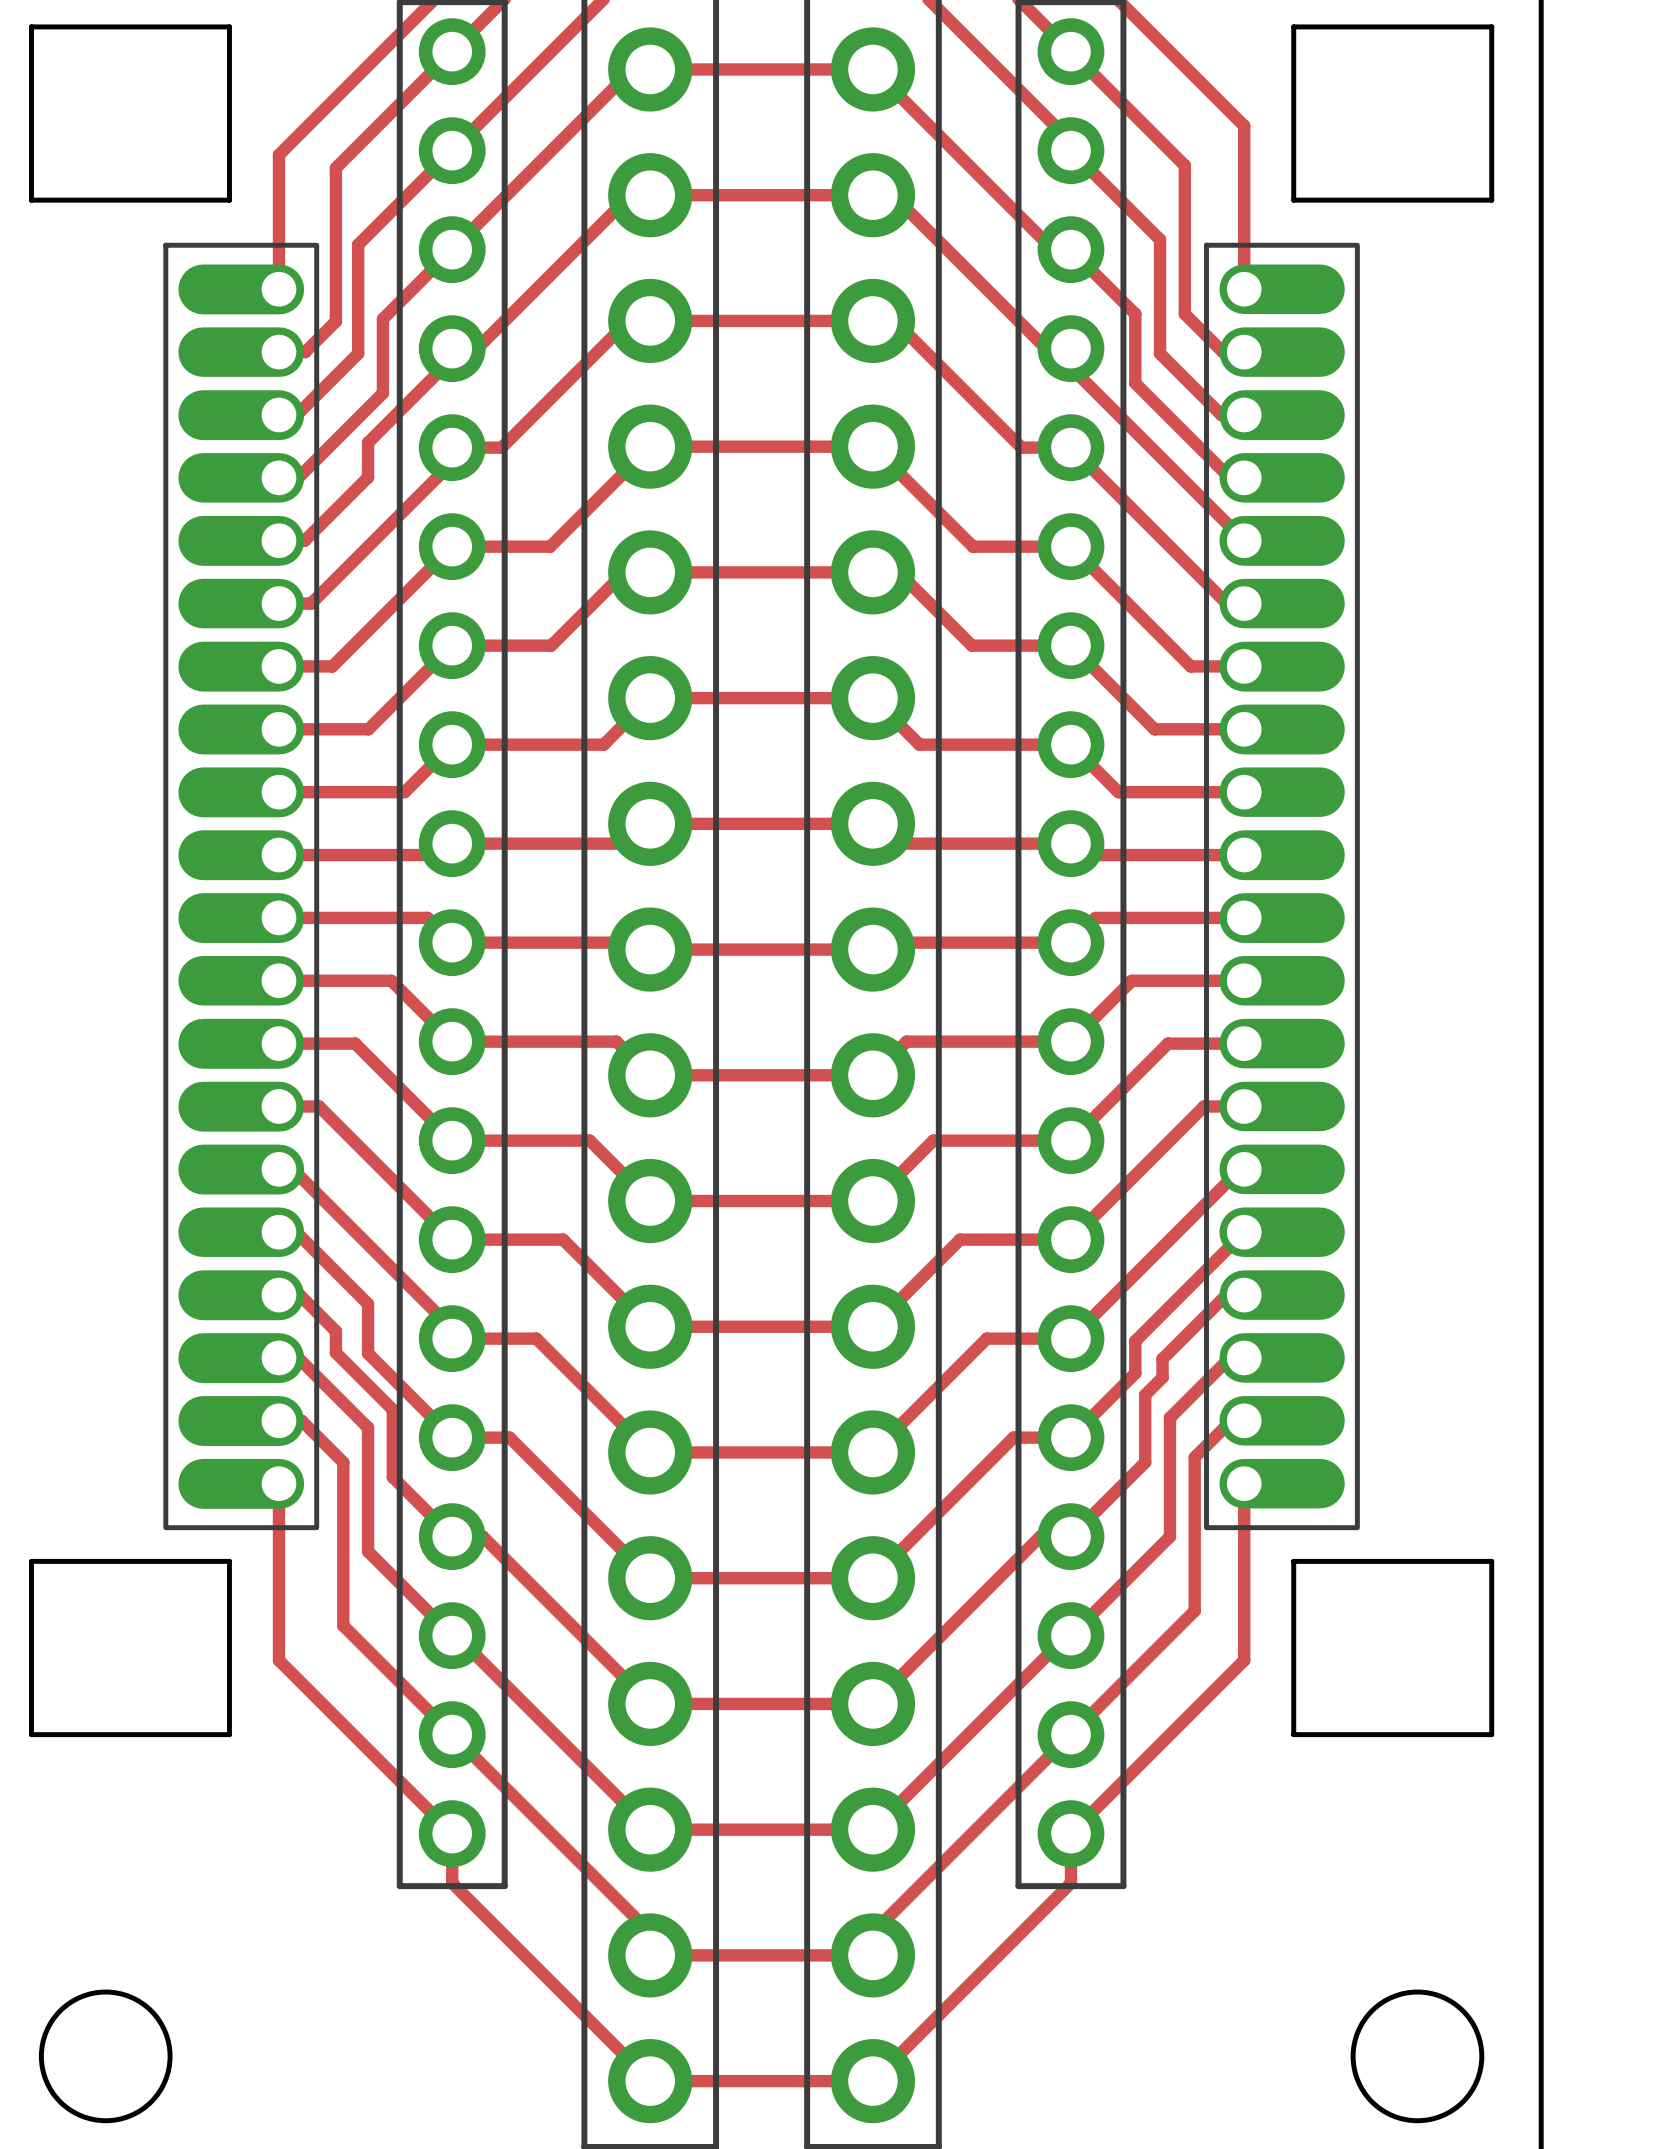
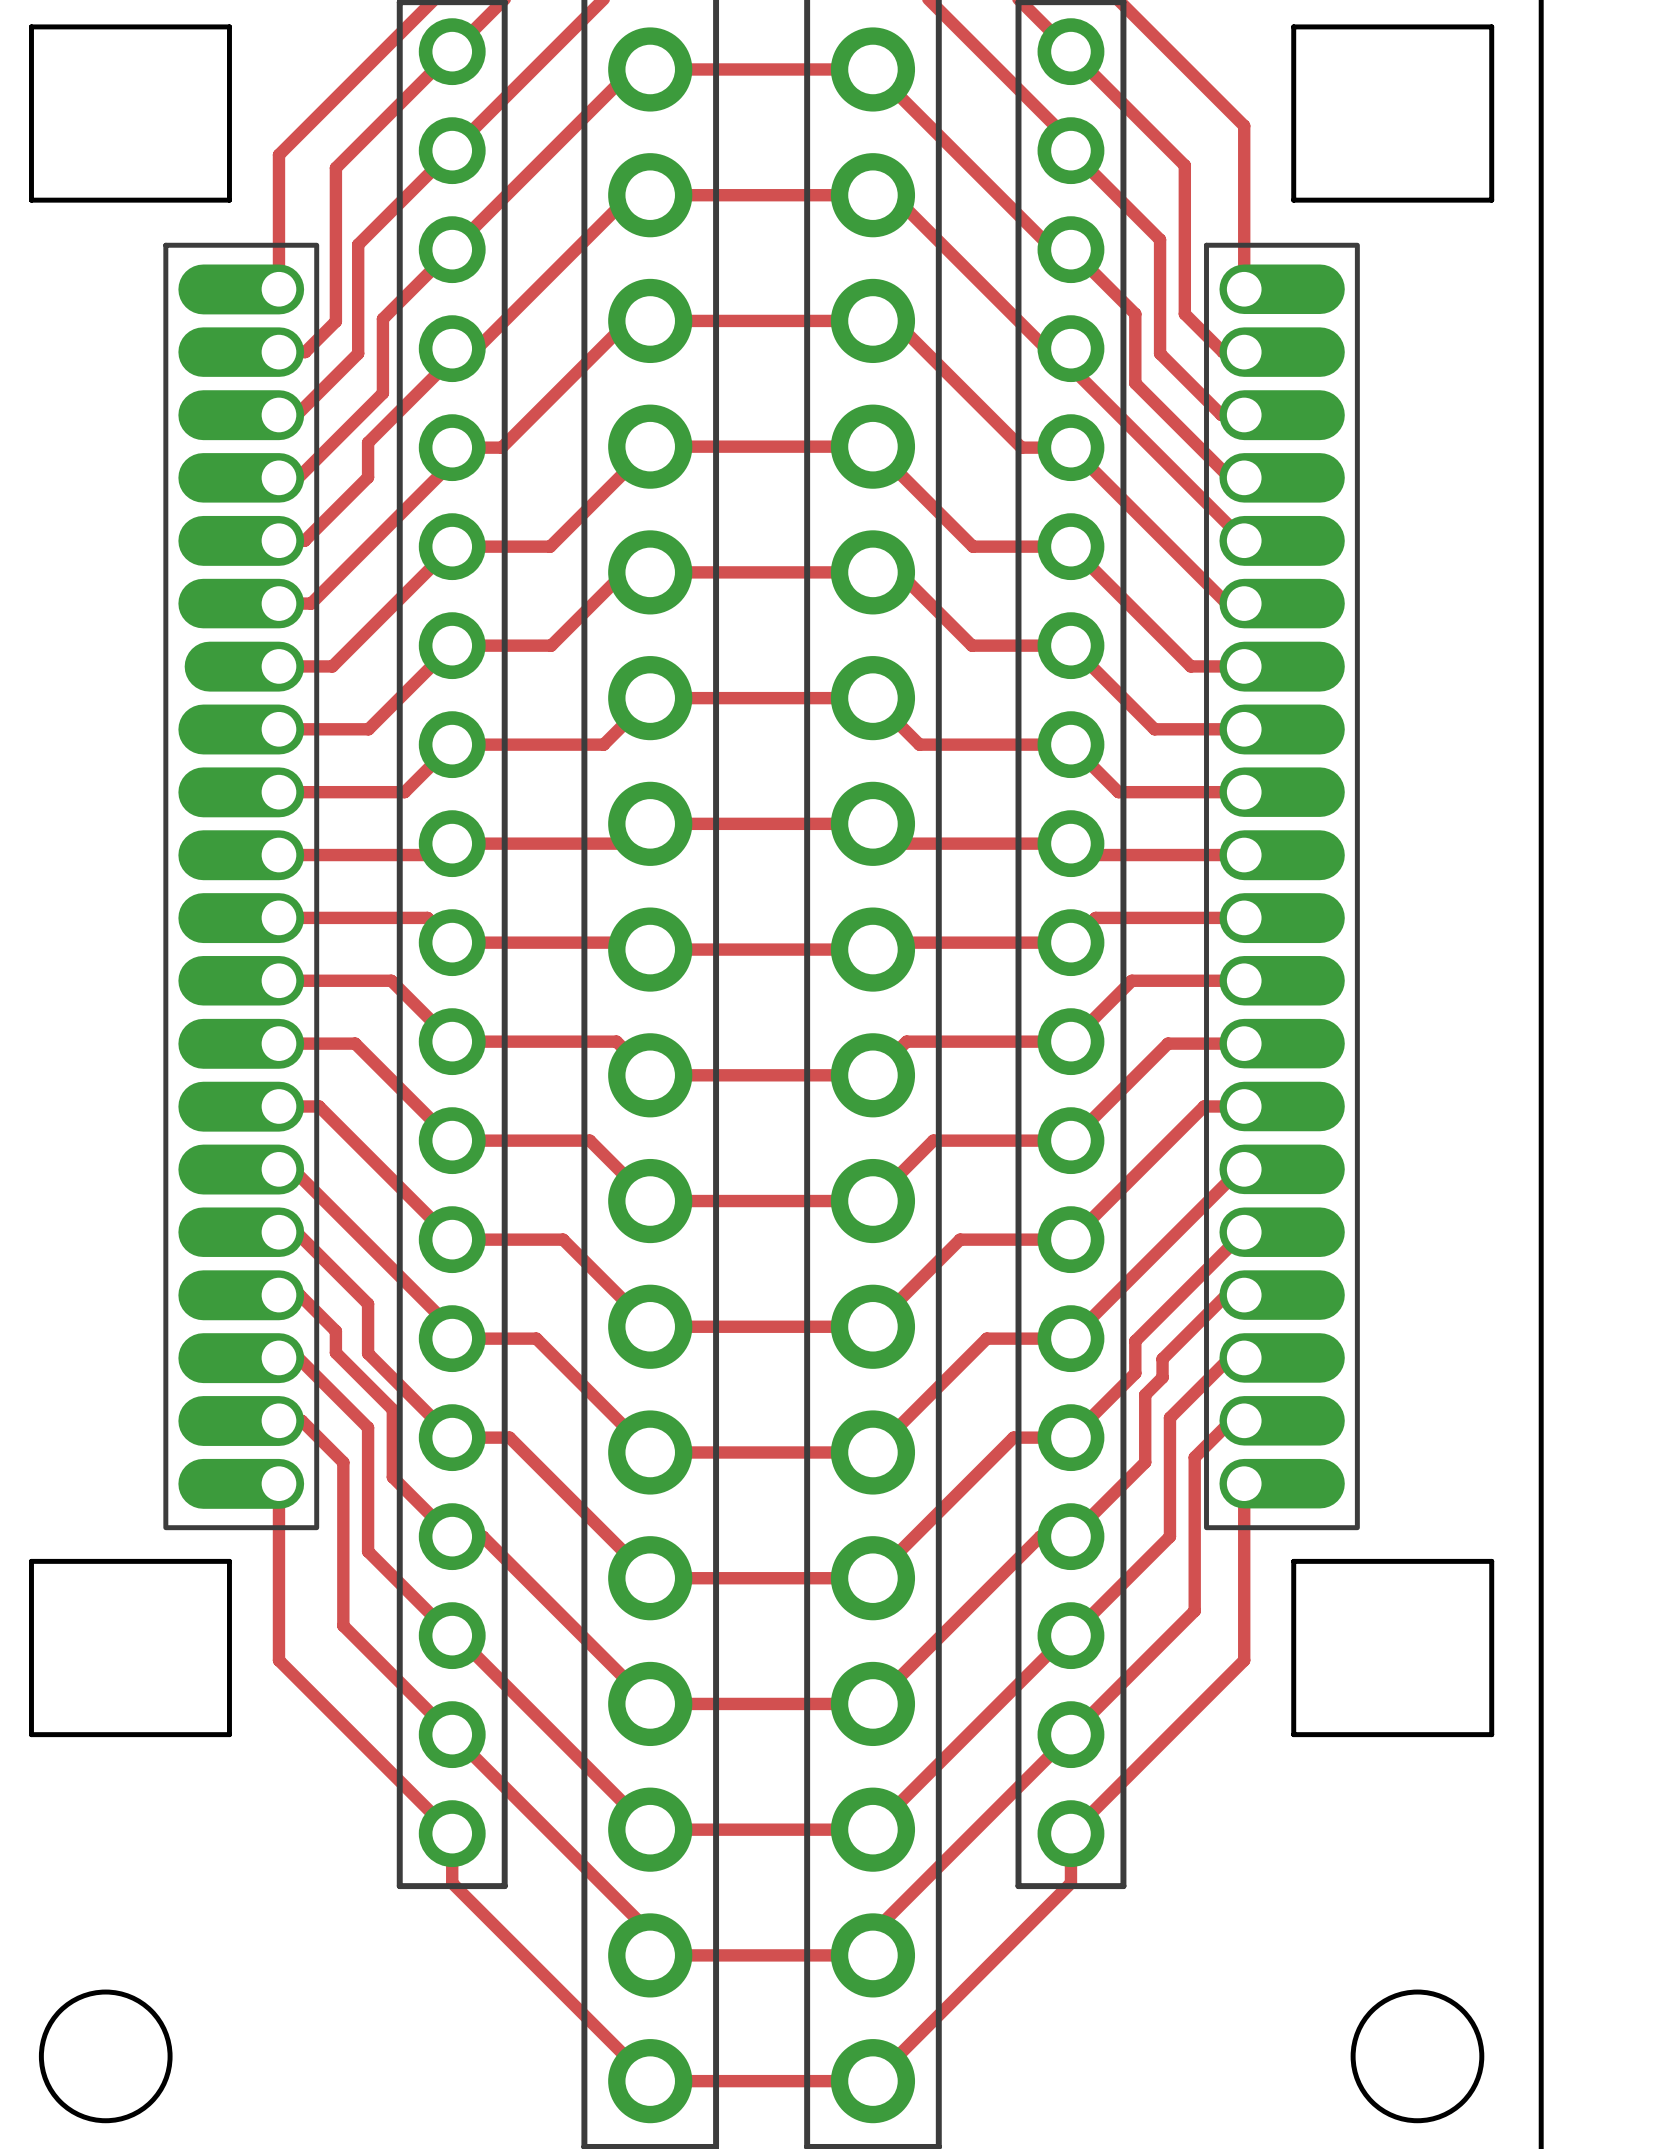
part footprint: [163, 242, 320, 1531] -> [163, 242, 320, 1531]

